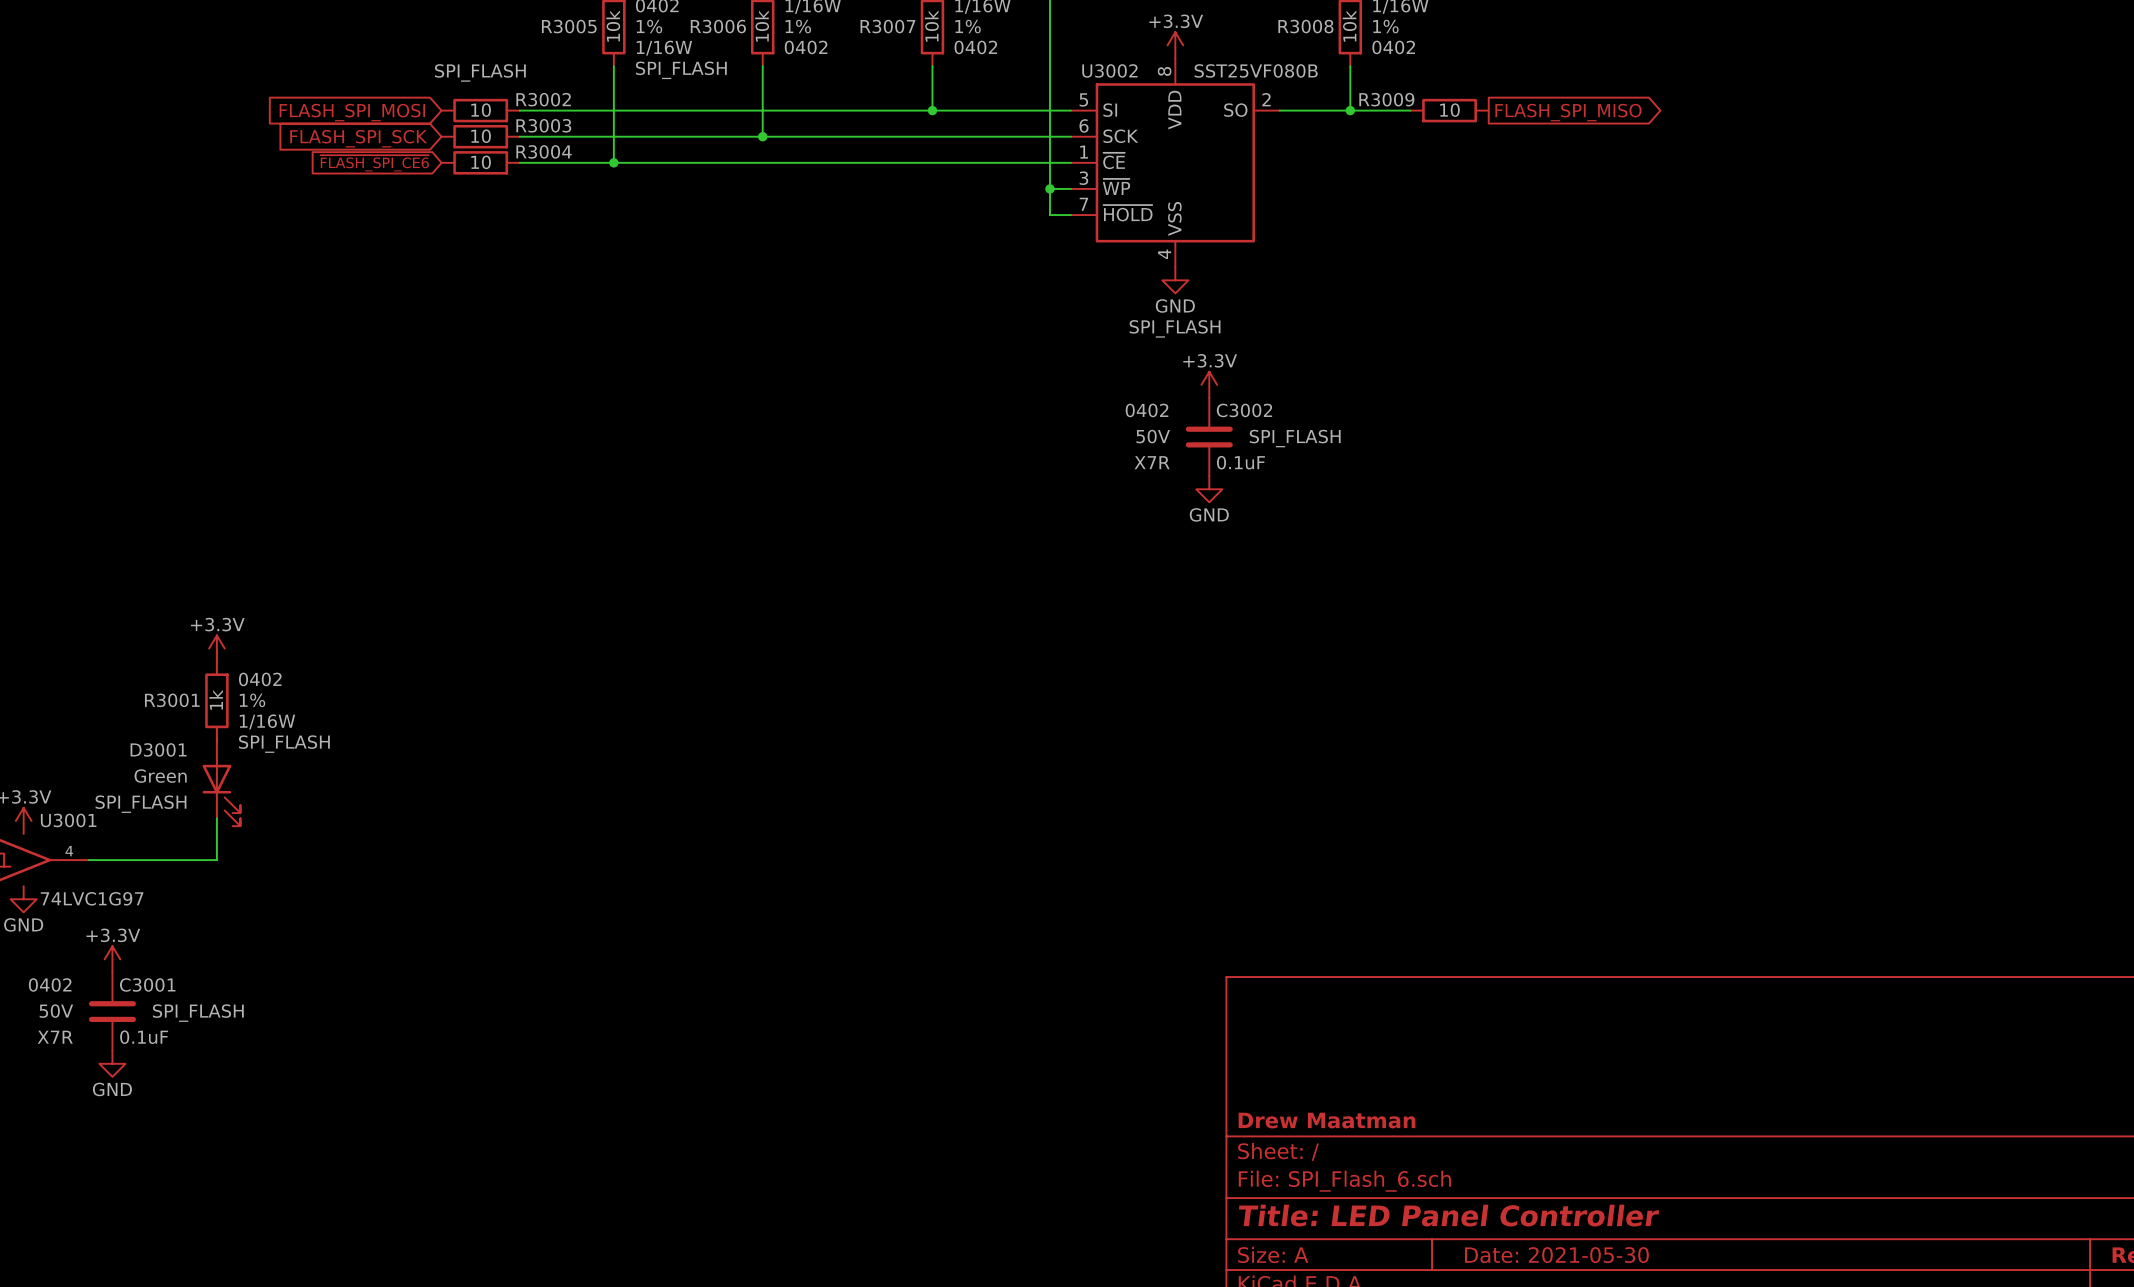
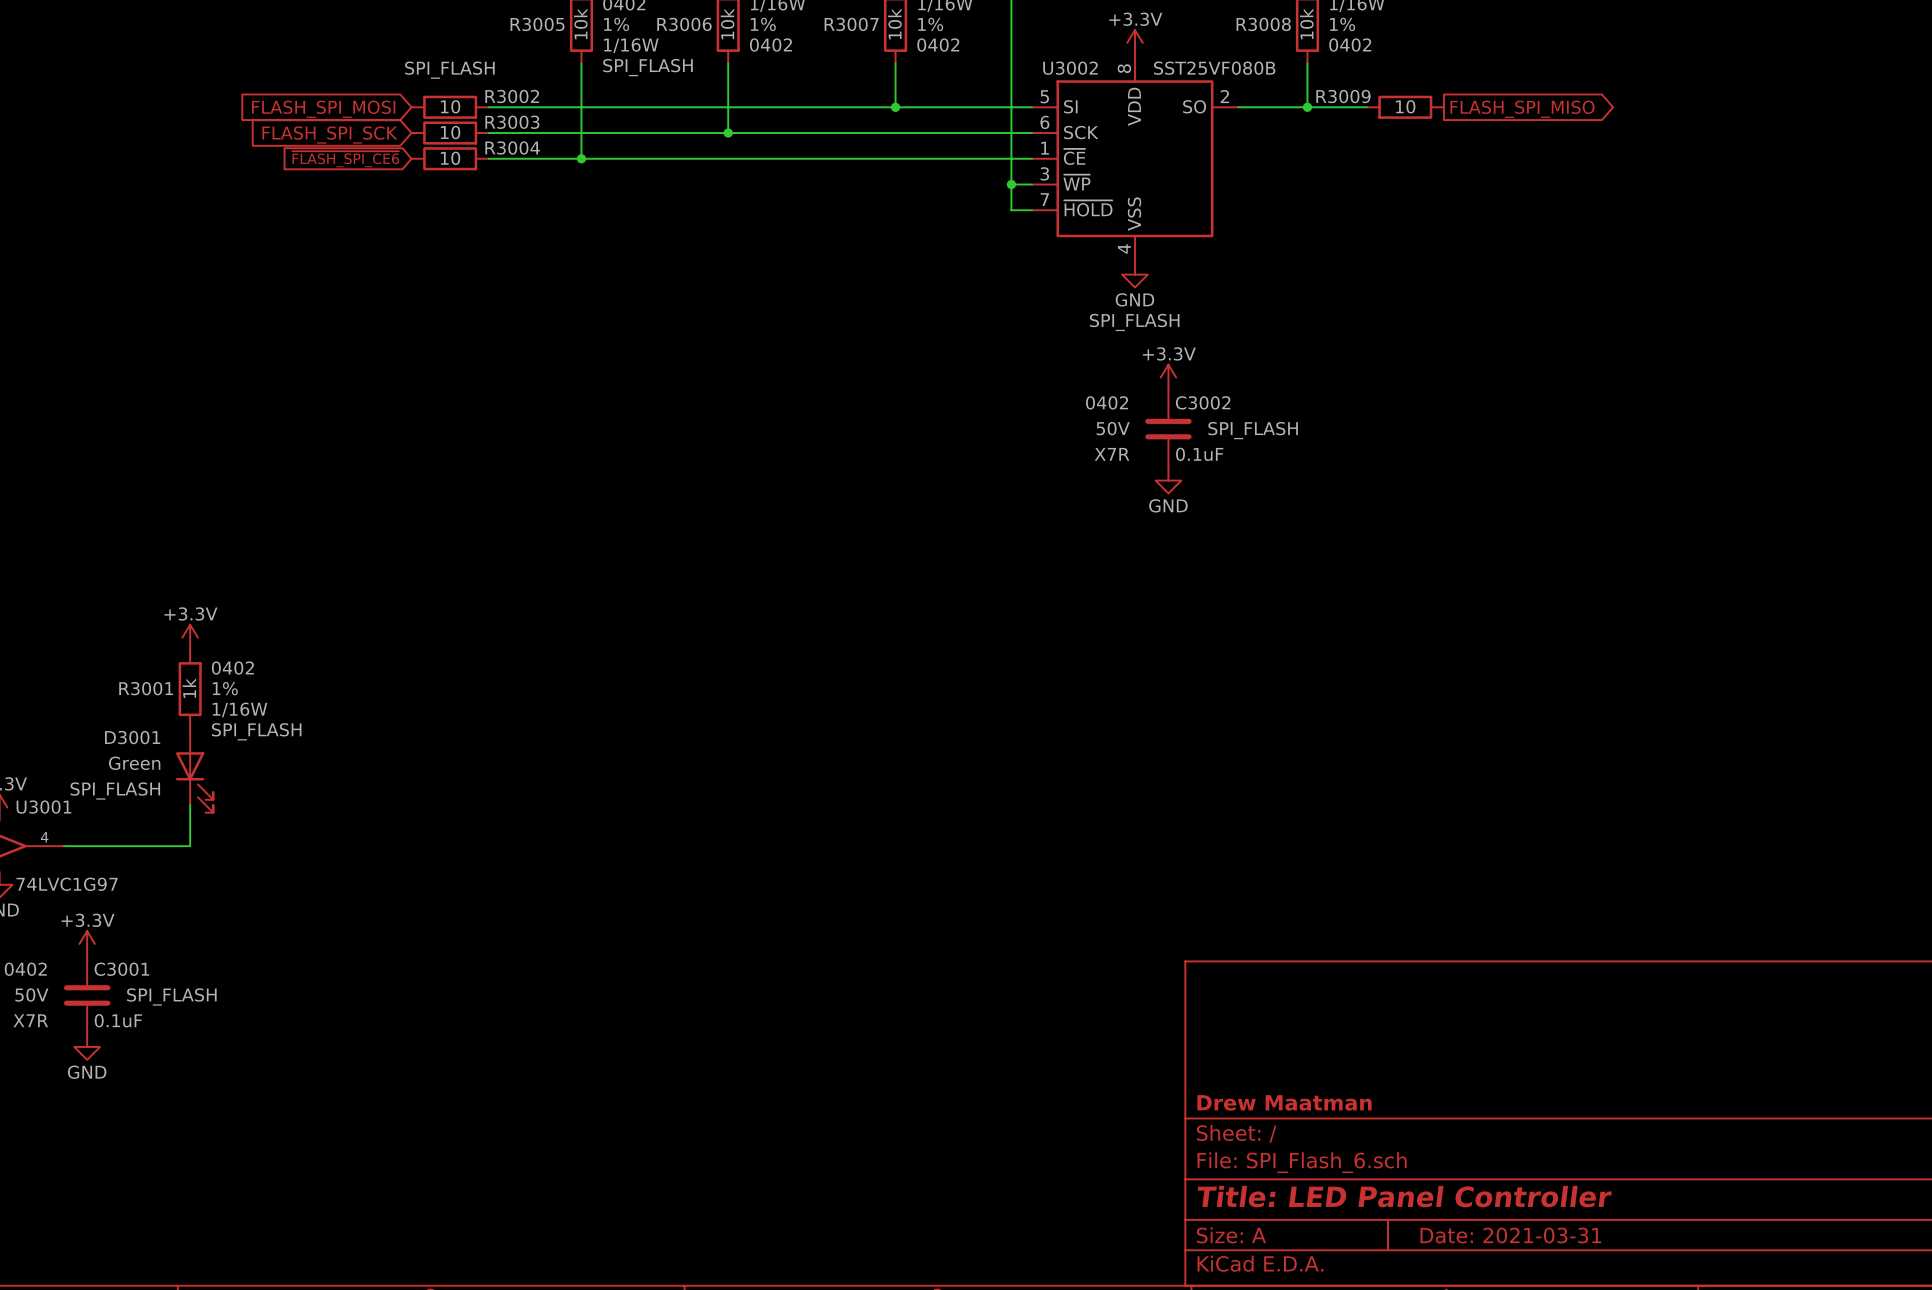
title block: Date: 2021-05-30 (1556, 1255) -> Date: 2021-03-31 (1510, 1235)

